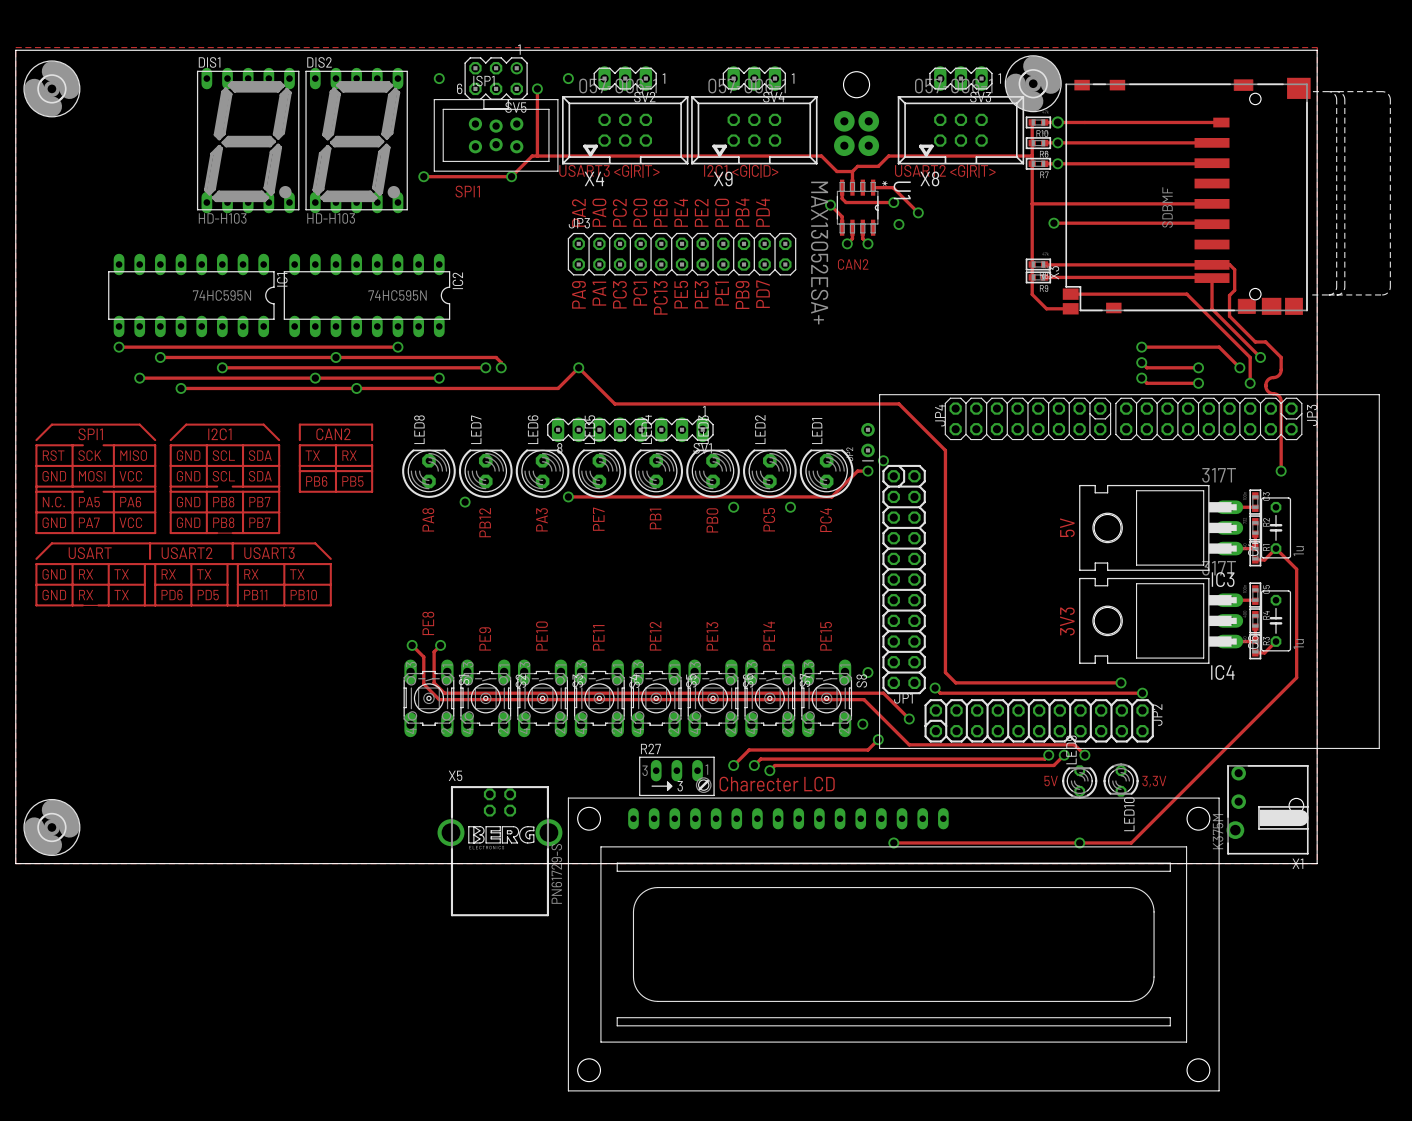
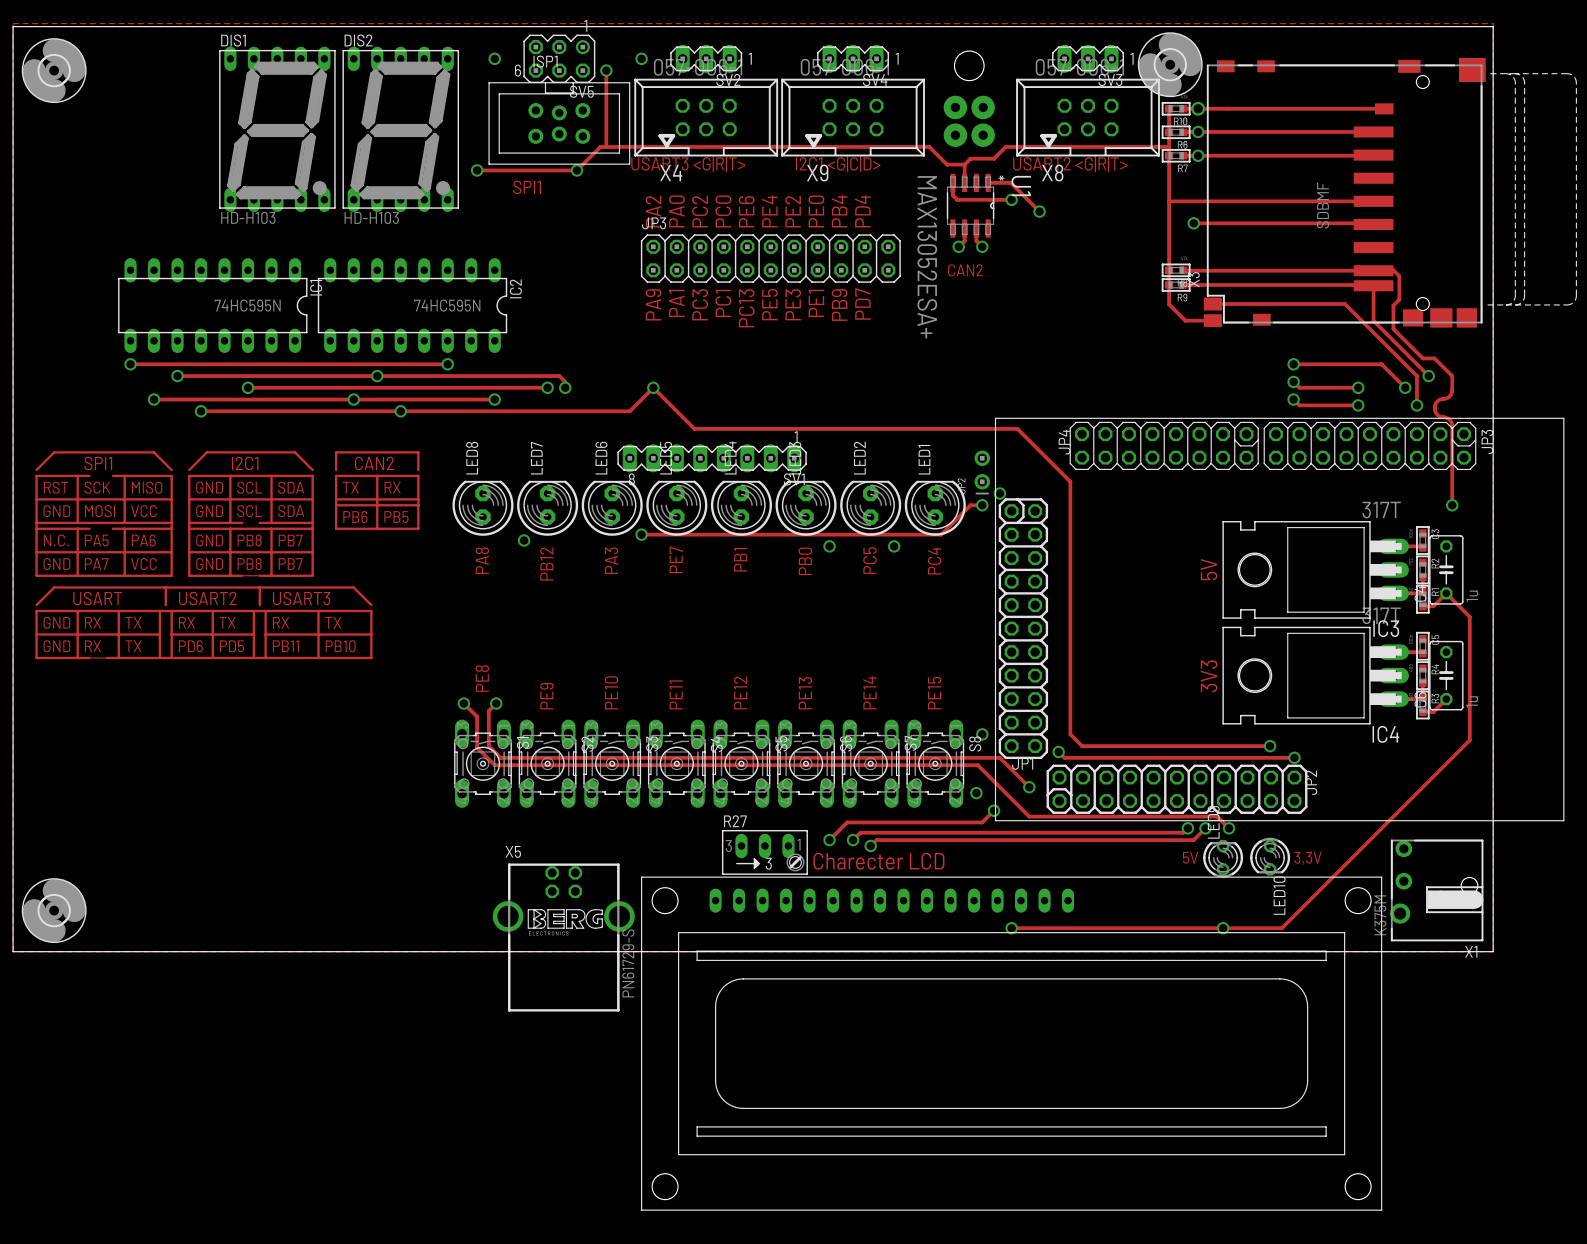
track: (830, 205) (842, 216) (842, 227) -> none
via: (830, 205) -> none
via: (898, 224) -> none

